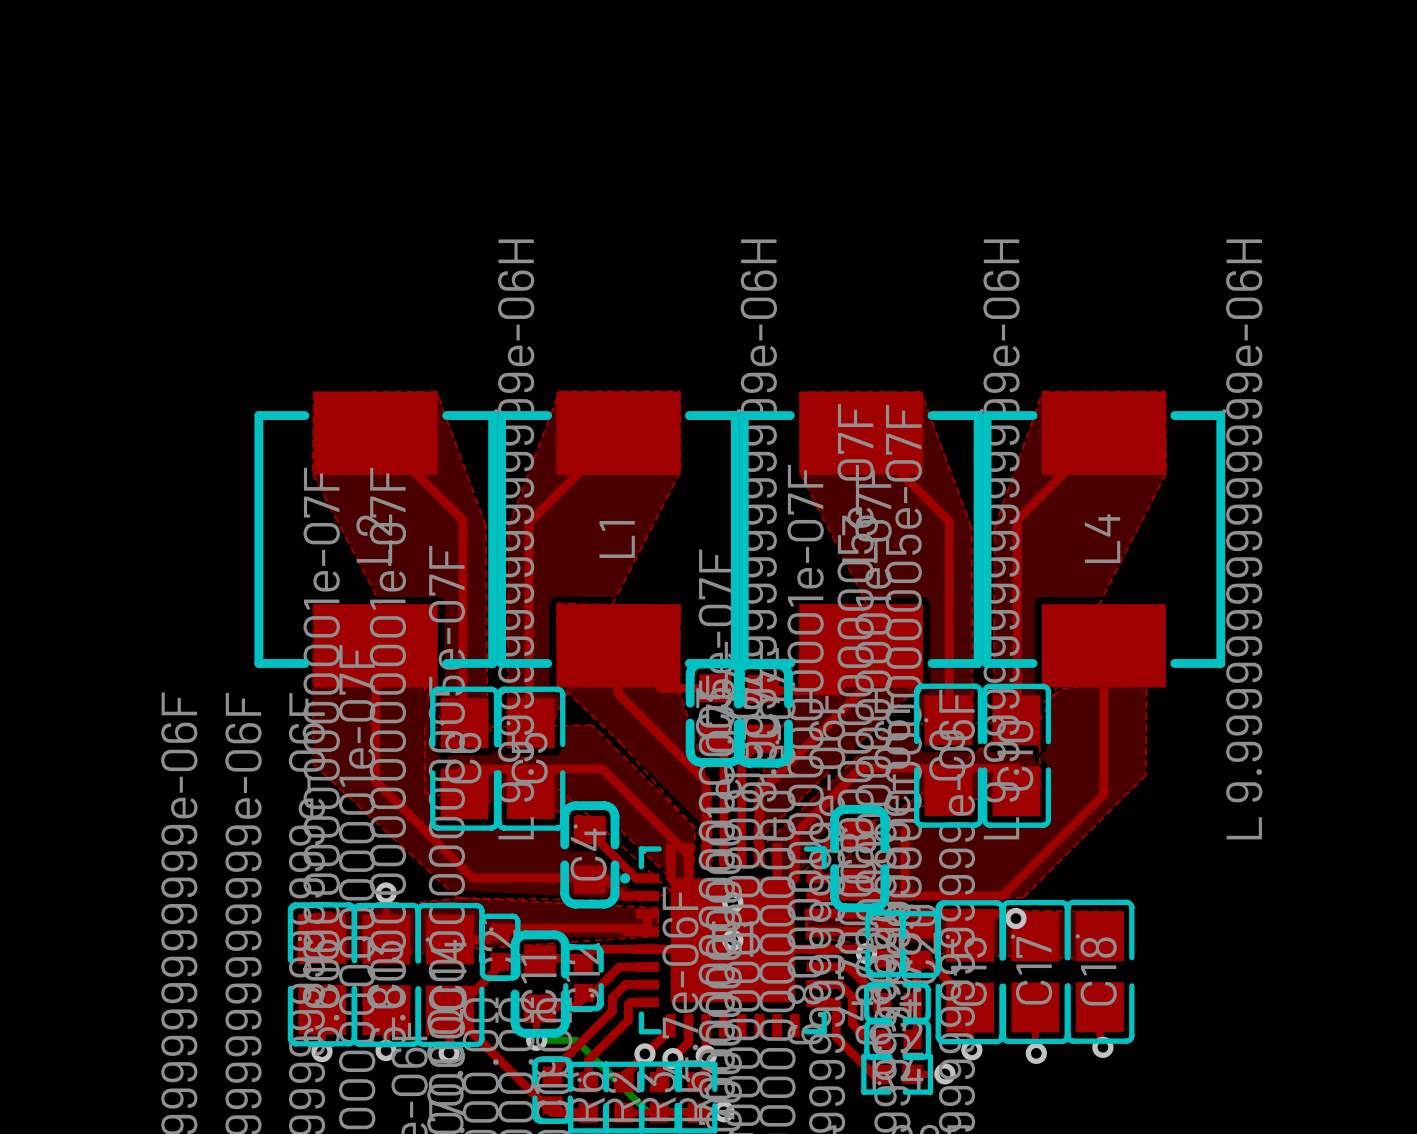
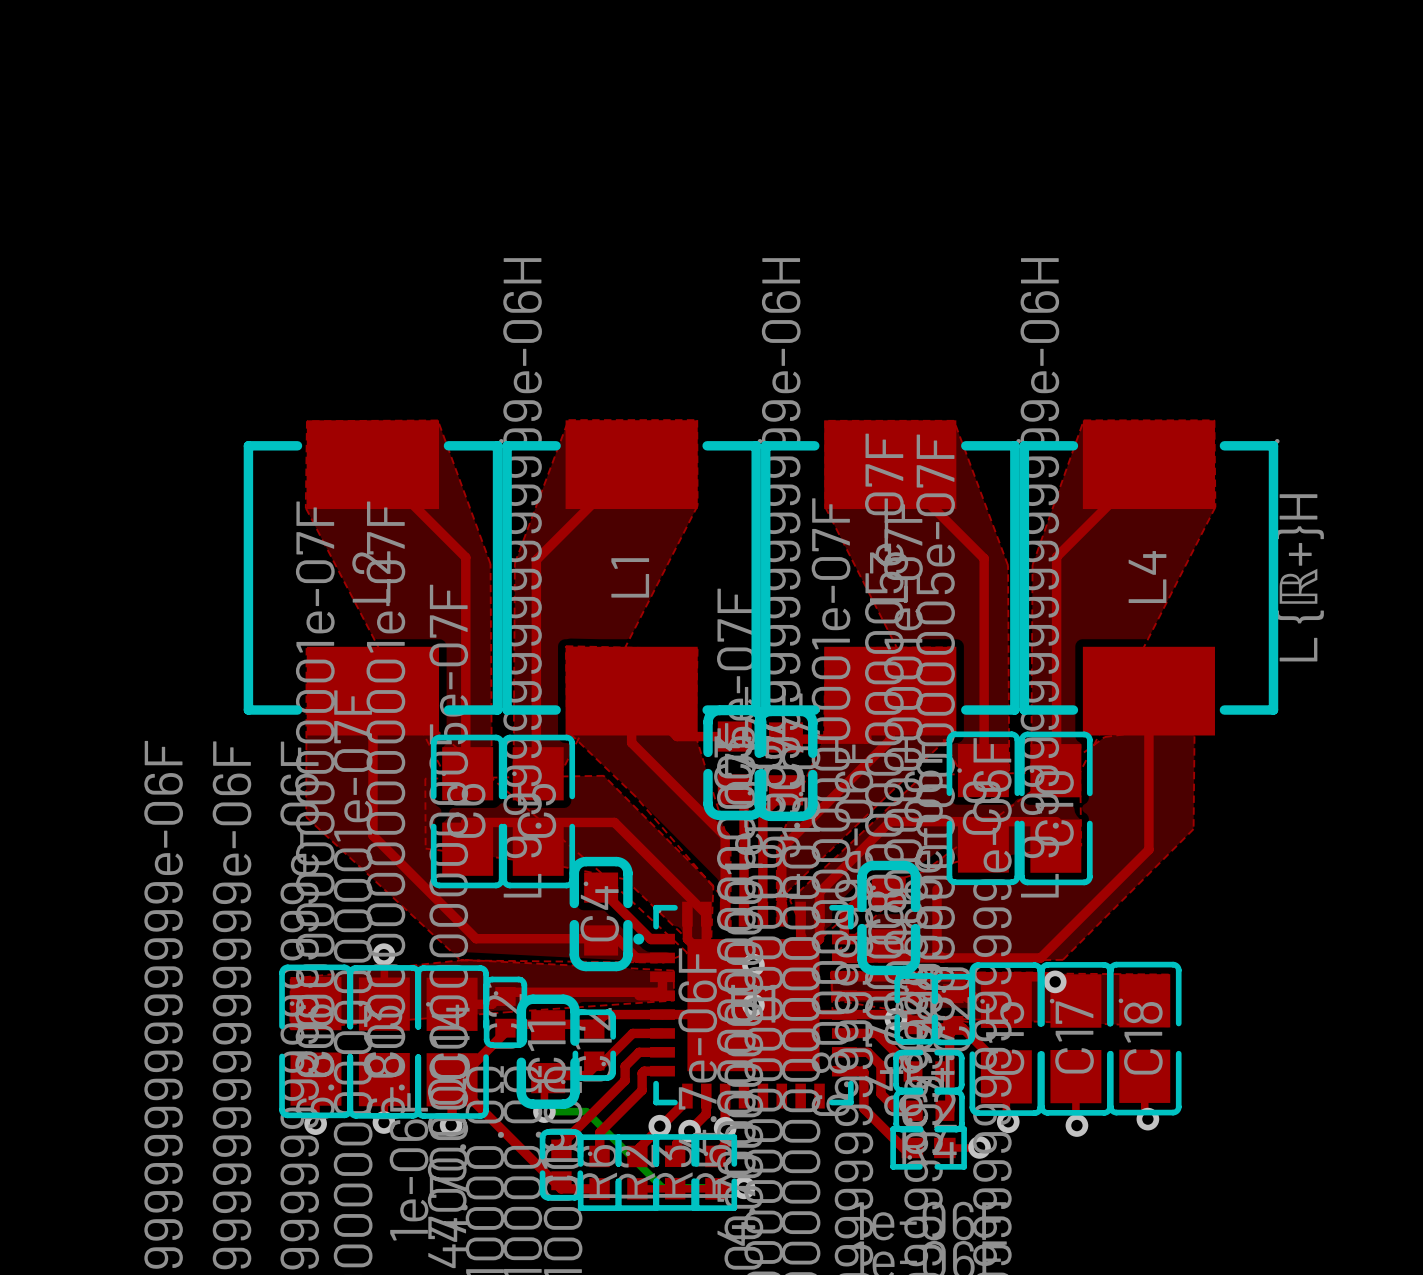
L4 value: L 9.999999999999999e-06H (1244, 539) -> L {ℝ+}H (1299, 577)

